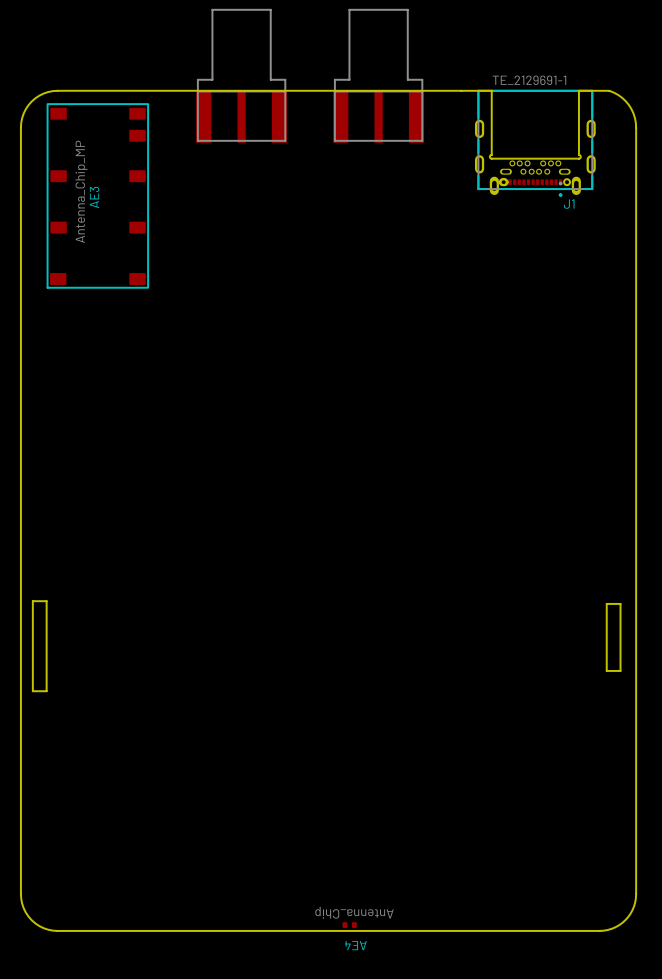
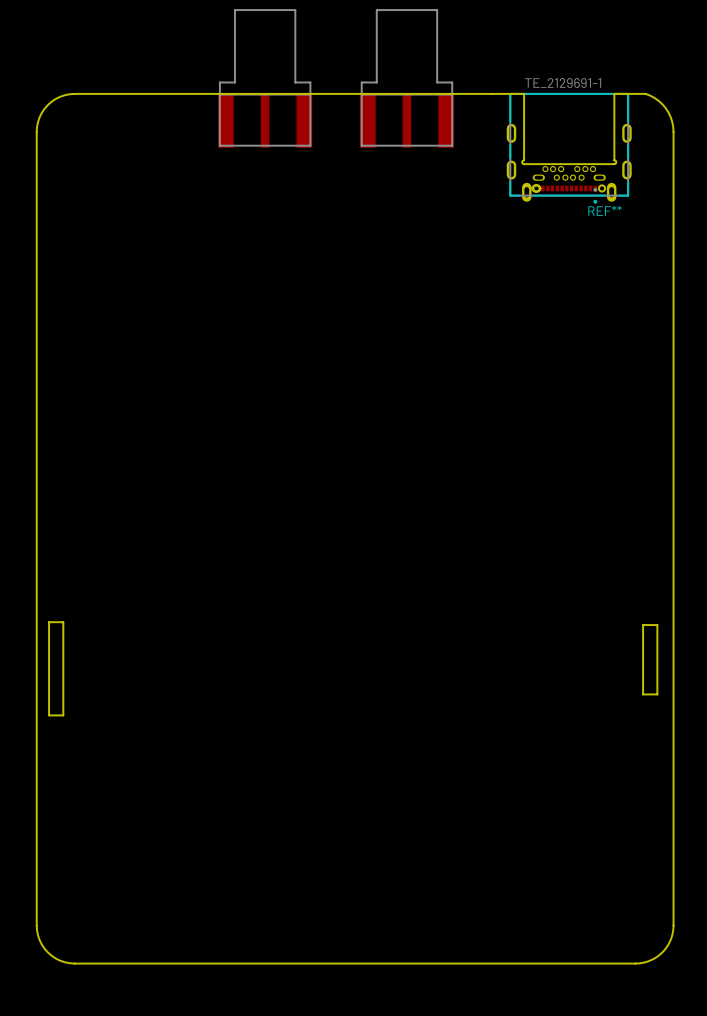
AE3: Antenna_Chip_MP (97, 195) -> none
J1 name: J1 (569, 204) -> REF** (605, 210)
AE4: Antenna_Chip (349, 925) -> none

